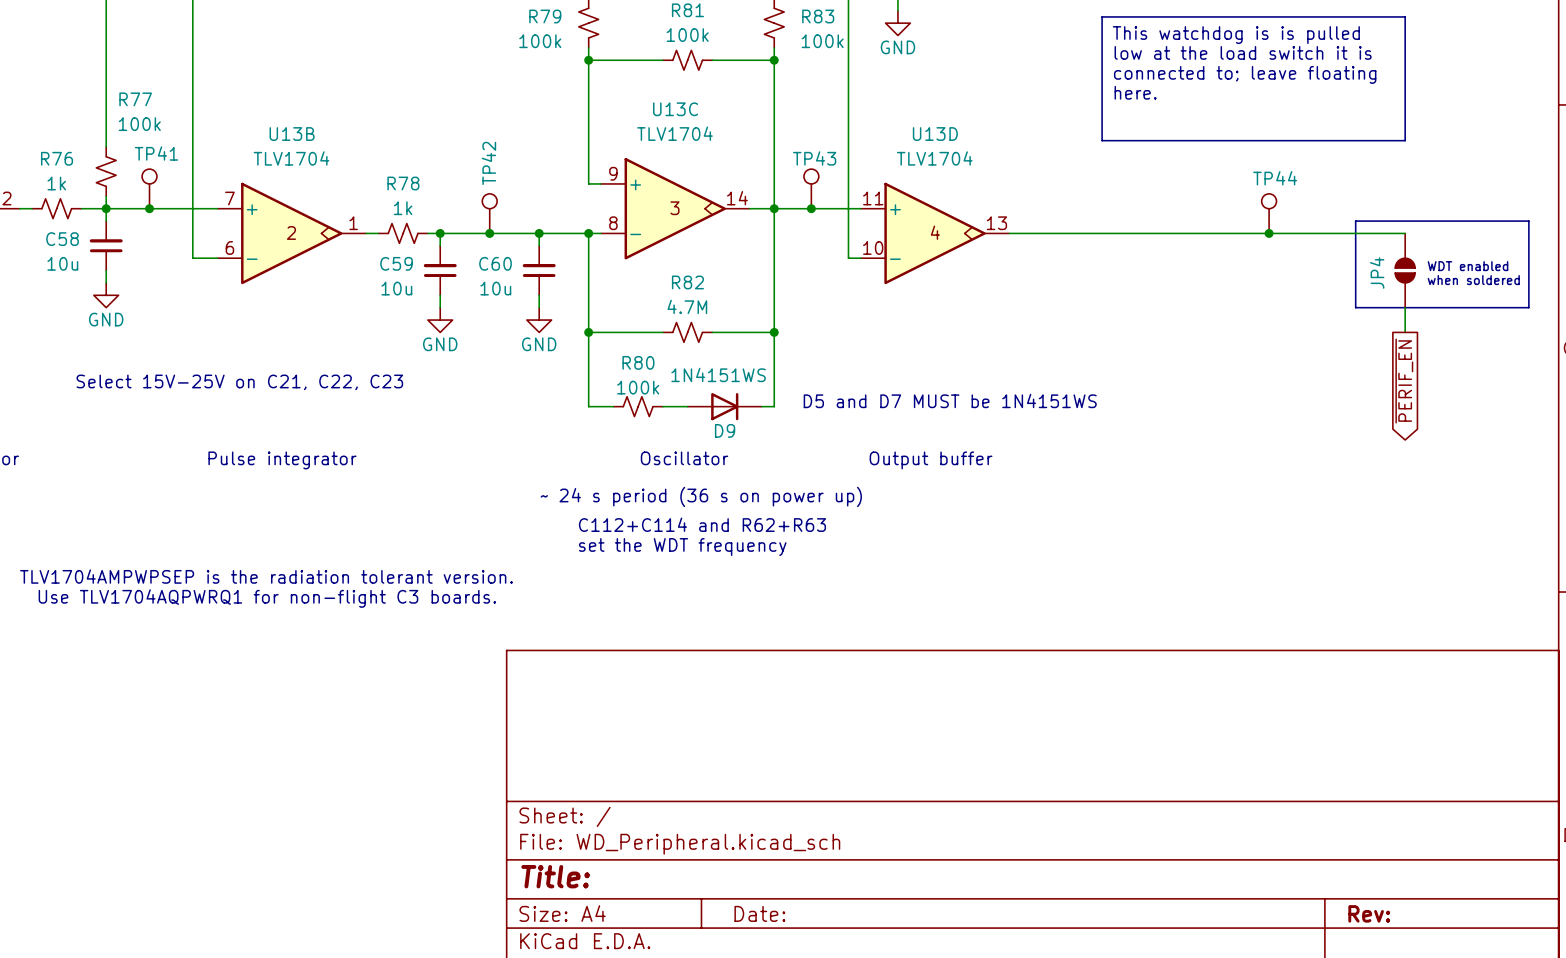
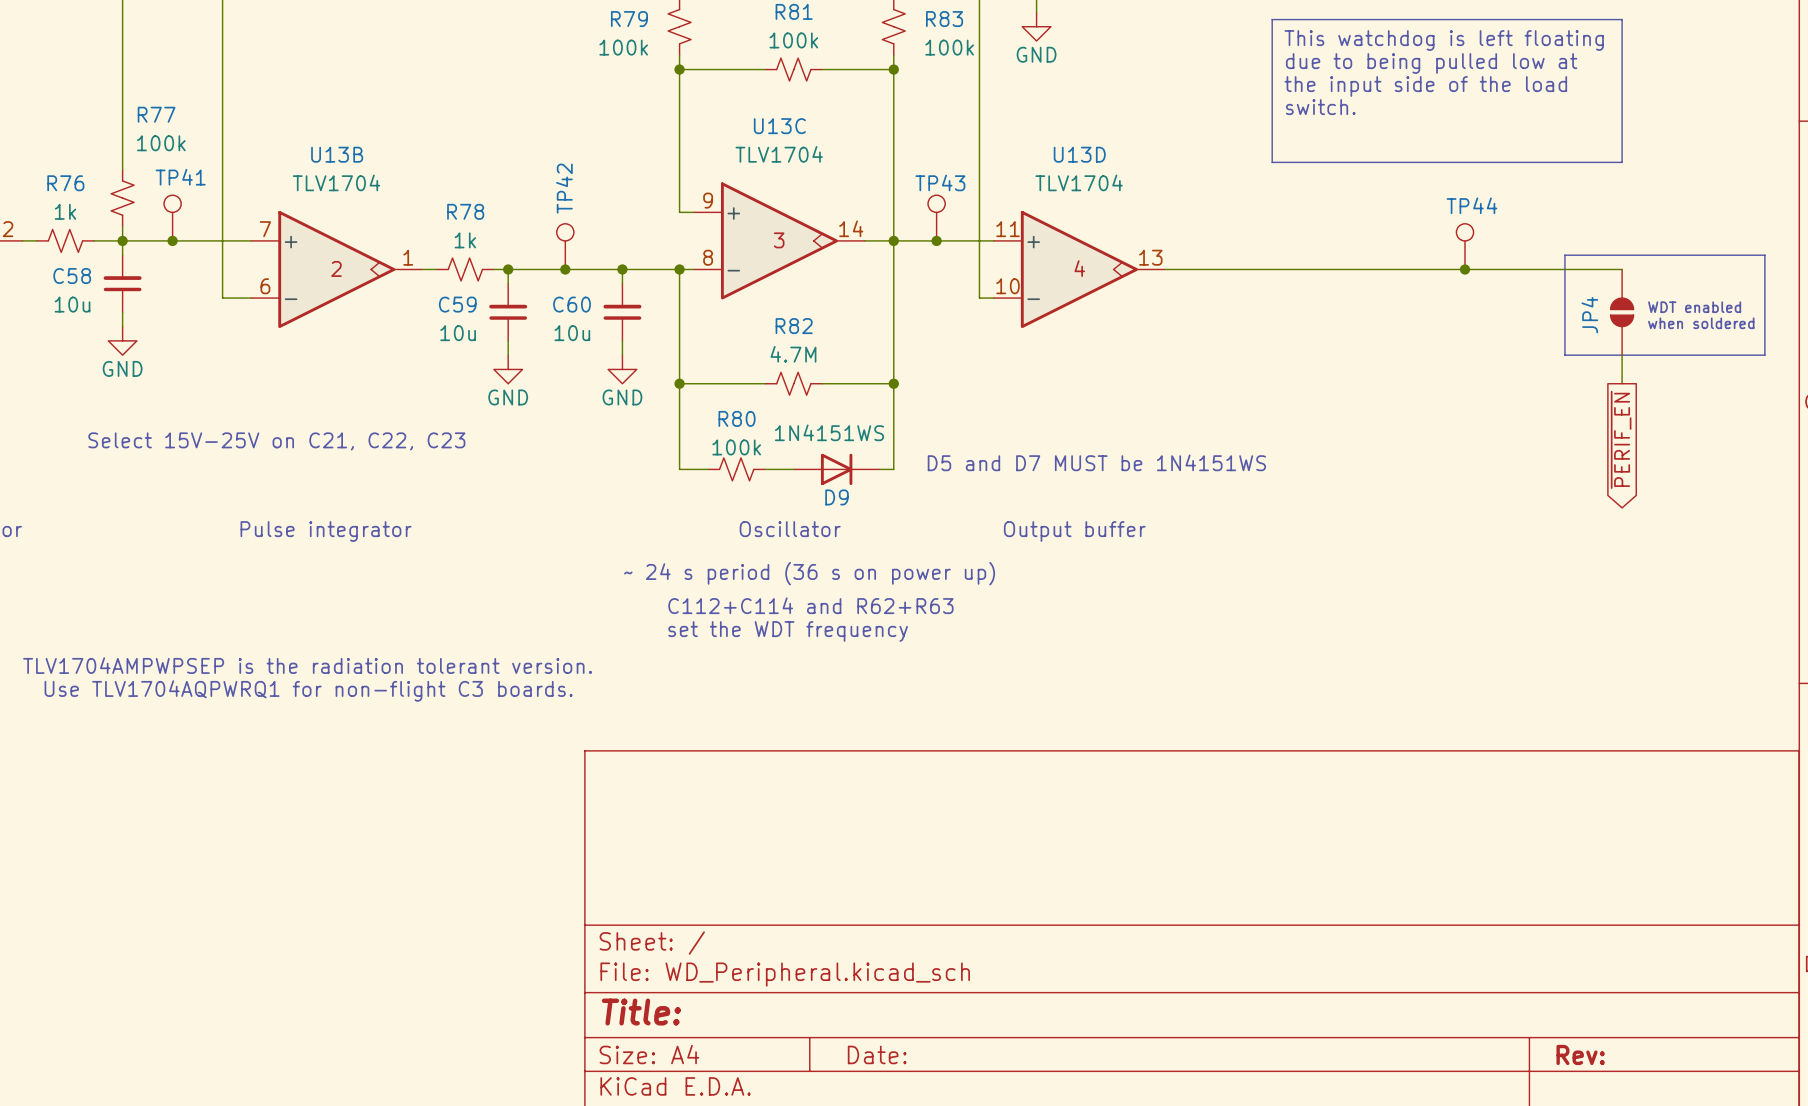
text: This watchdog is is pulled (1236, 35) -> This watchdog is left floating (1444, 40)
text: low at the load switch it is (1243, 52) -> due to being pulled low at (1431, 63)
text: connected to; leave floating (1245, 74) -> the input side of the load (1425, 86)
text: here. (1135, 92) -> switch. (1320, 107)

